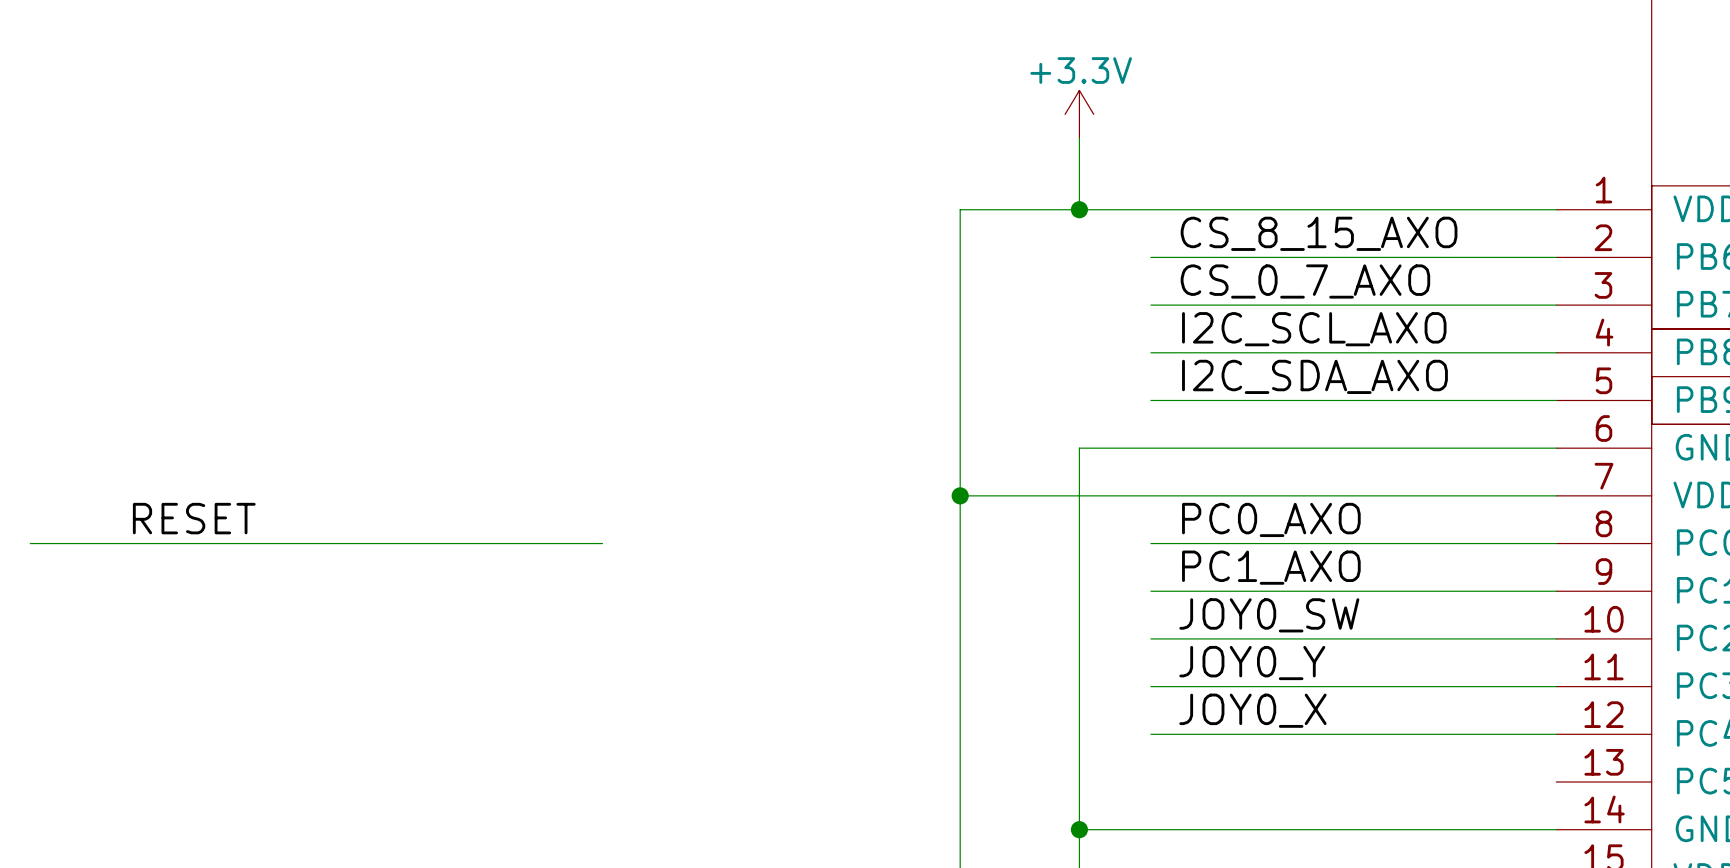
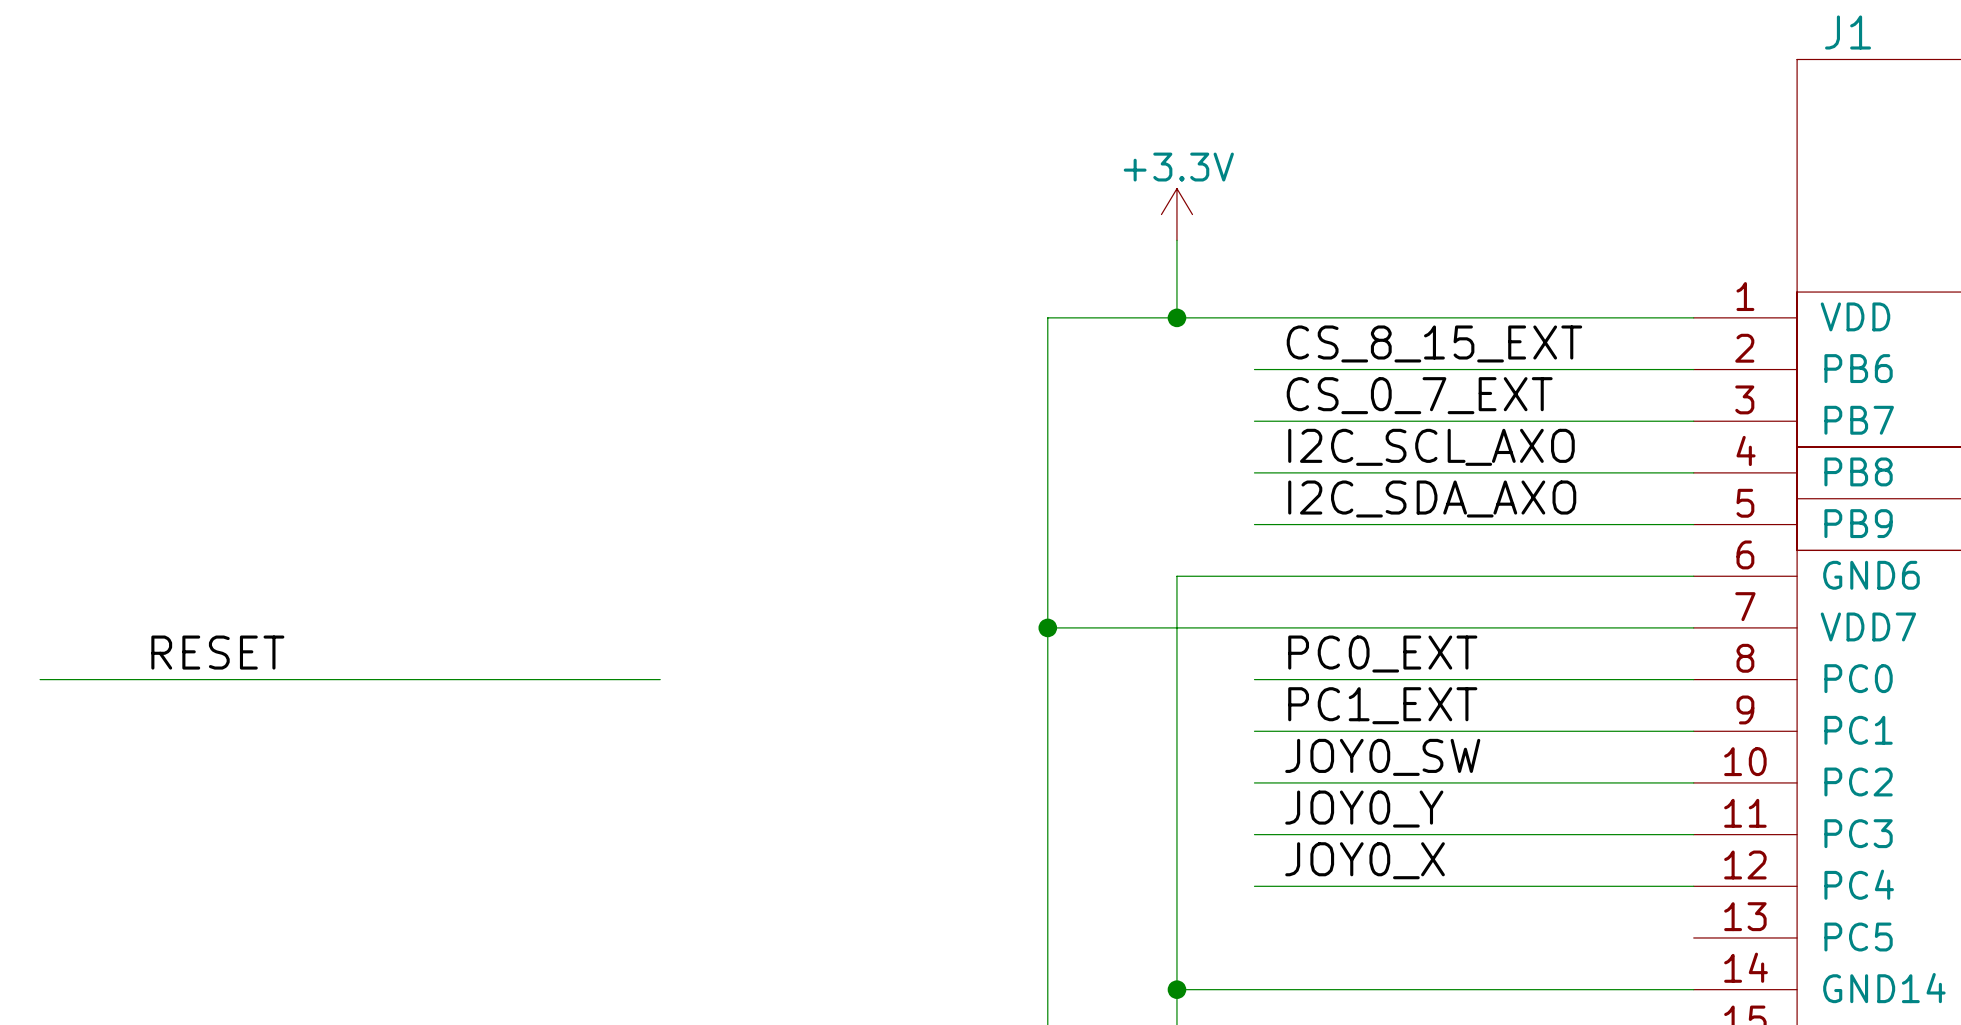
label: CS_8_15_AXO (1319, 233) -> CS_8_15_EXT (1434, 343)
label: CS_0_7_AXO (1305, 281) -> CS_0_7_EXT (1419, 395)
label: PC0_AXO (1271, 519) -> PC0_EXT (1382, 654)
label: PC1_AXO (1271, 567) -> PC1_EXT (1382, 705)

